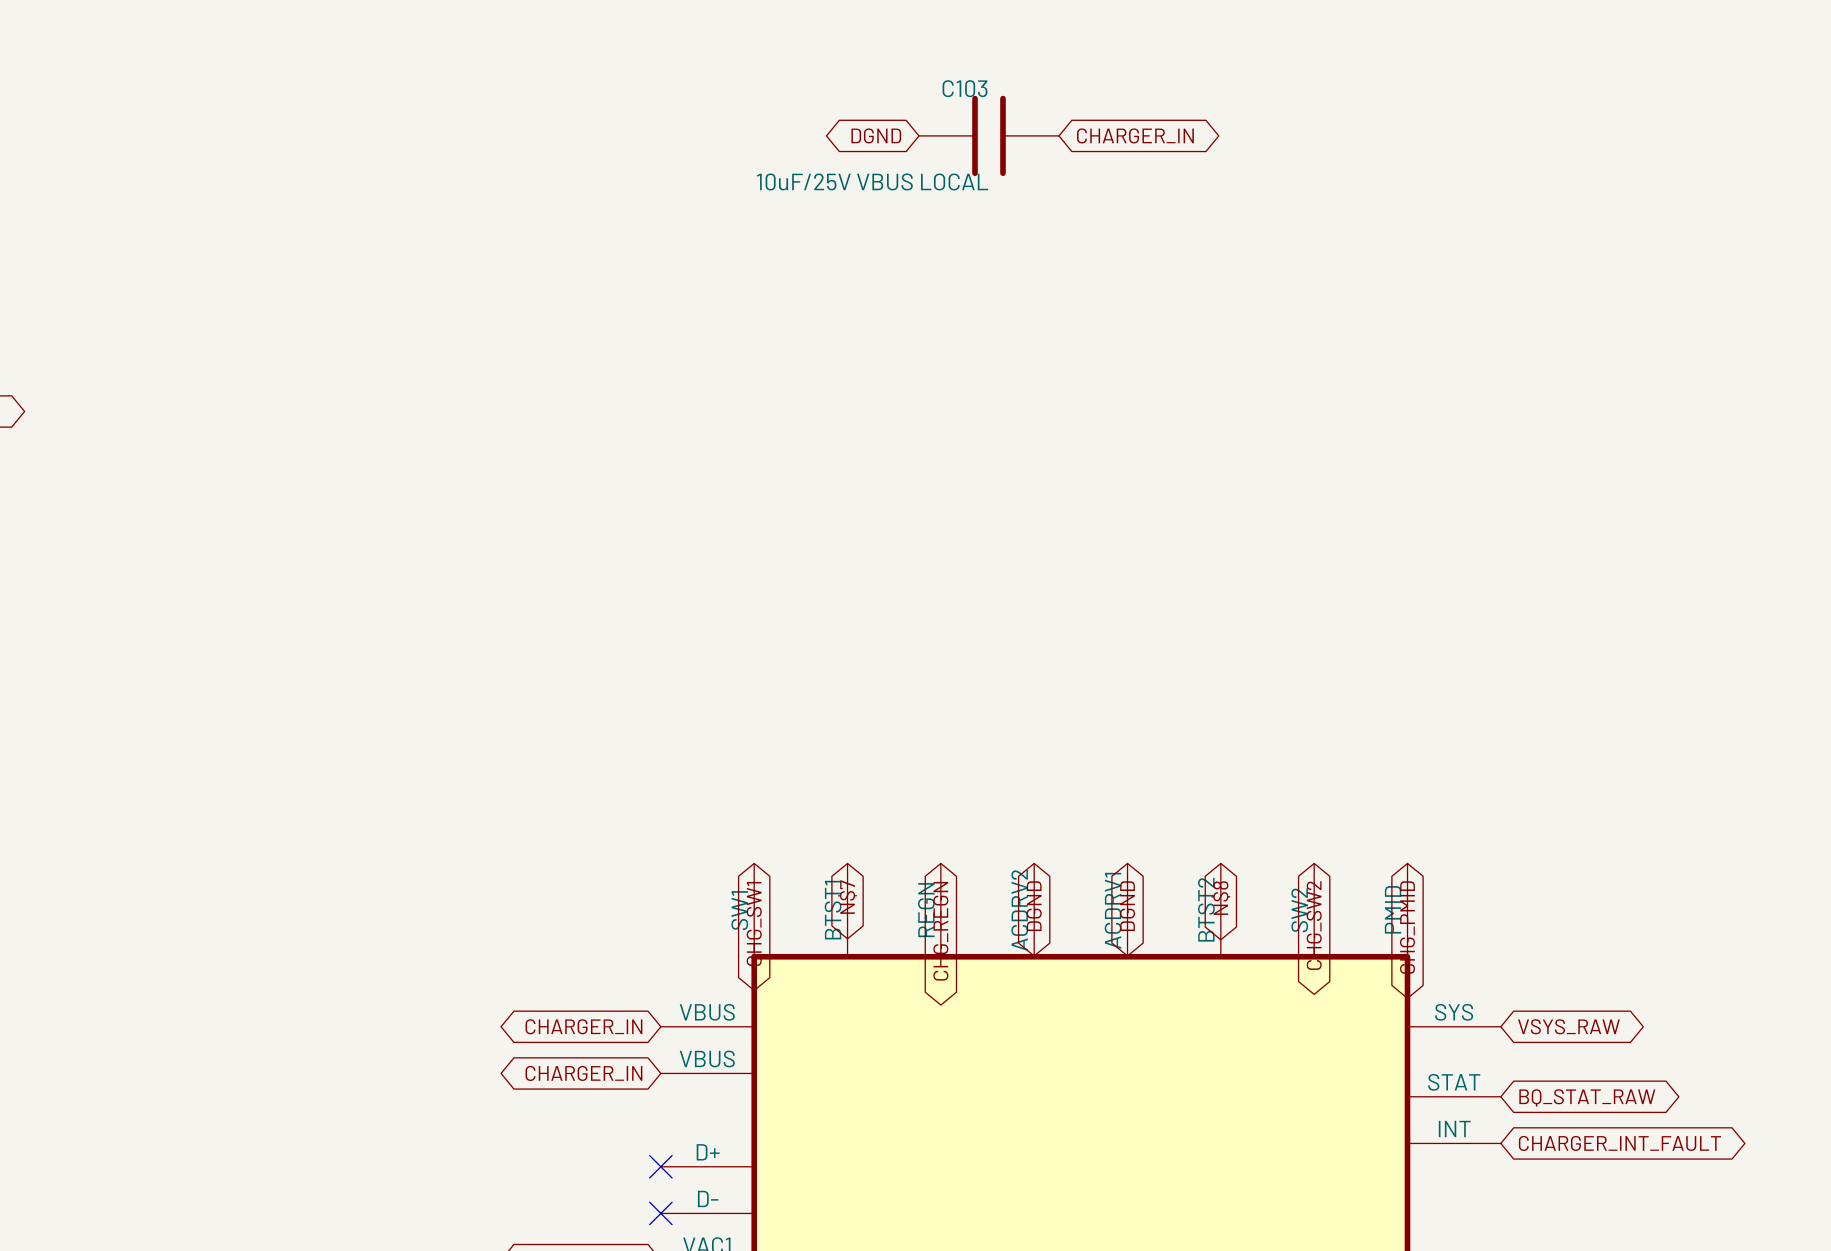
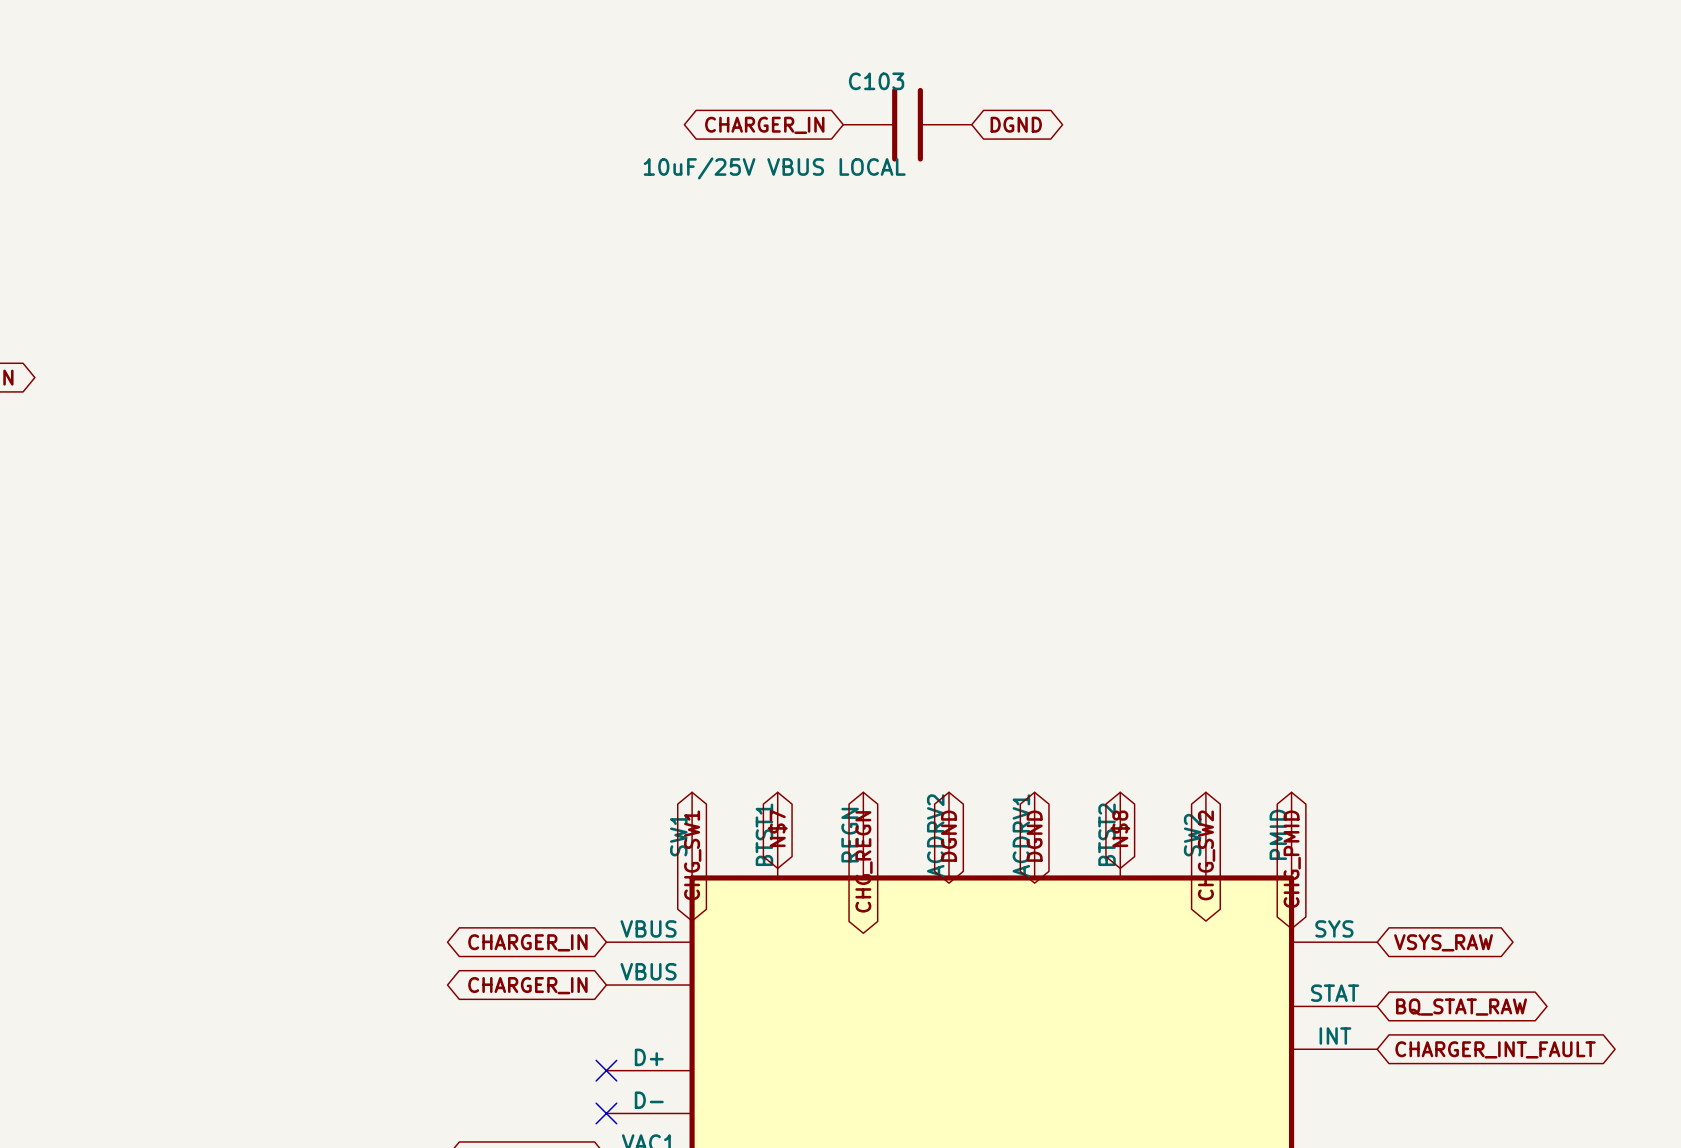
global label: DGND (876, 135) -> CHARGER_IN (764, 125)
global label: CHARGER_IN (1135, 135) -> DGND (1016, 124)

